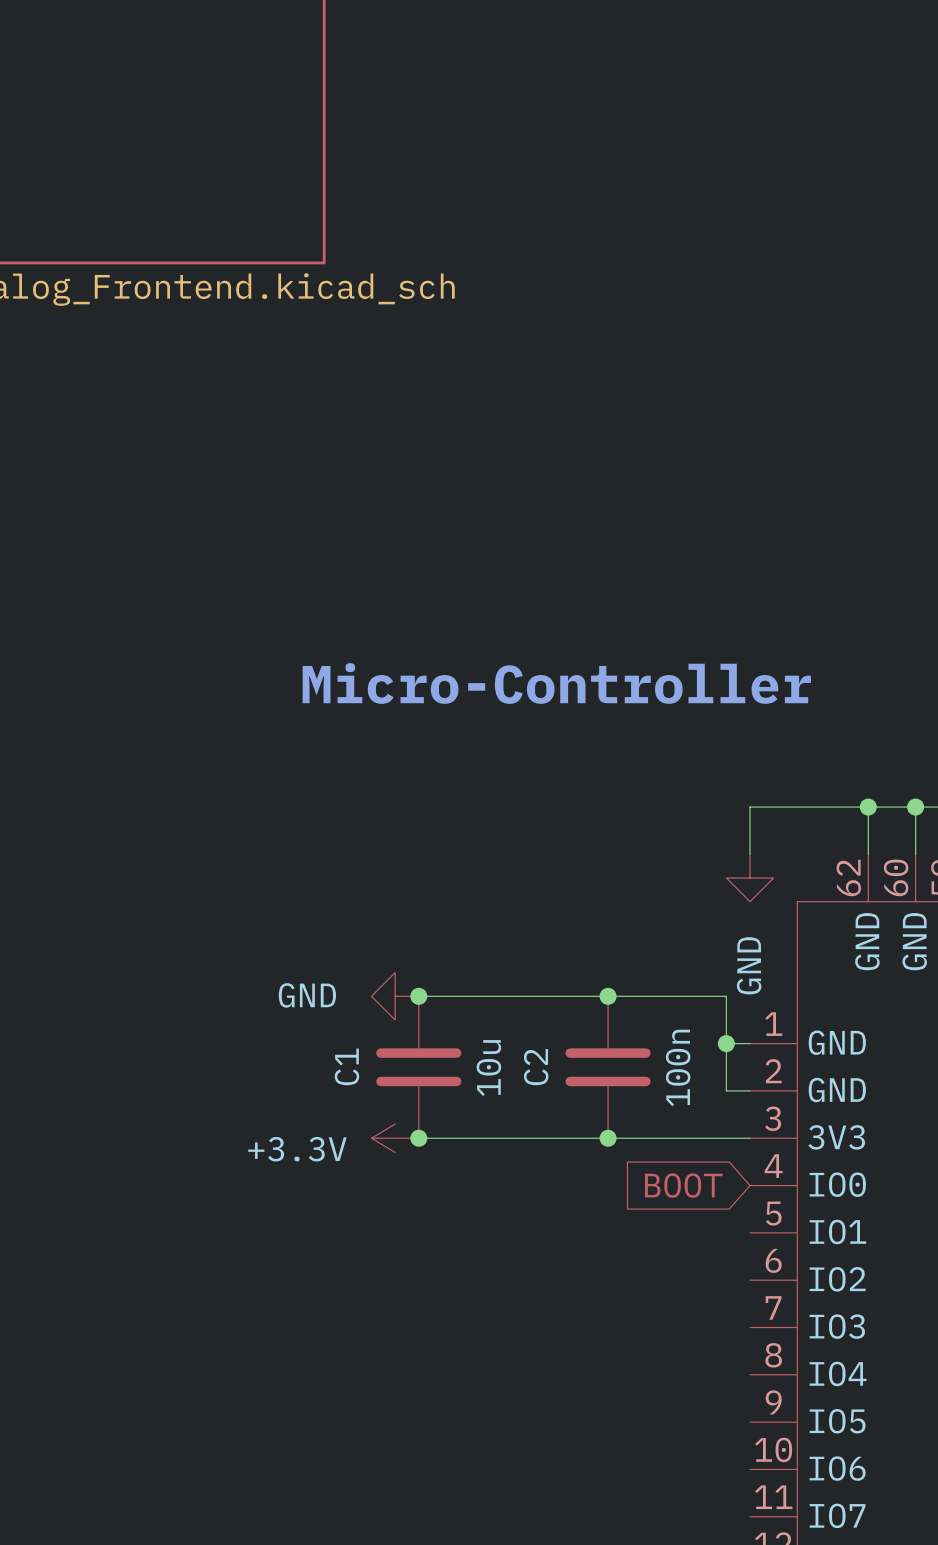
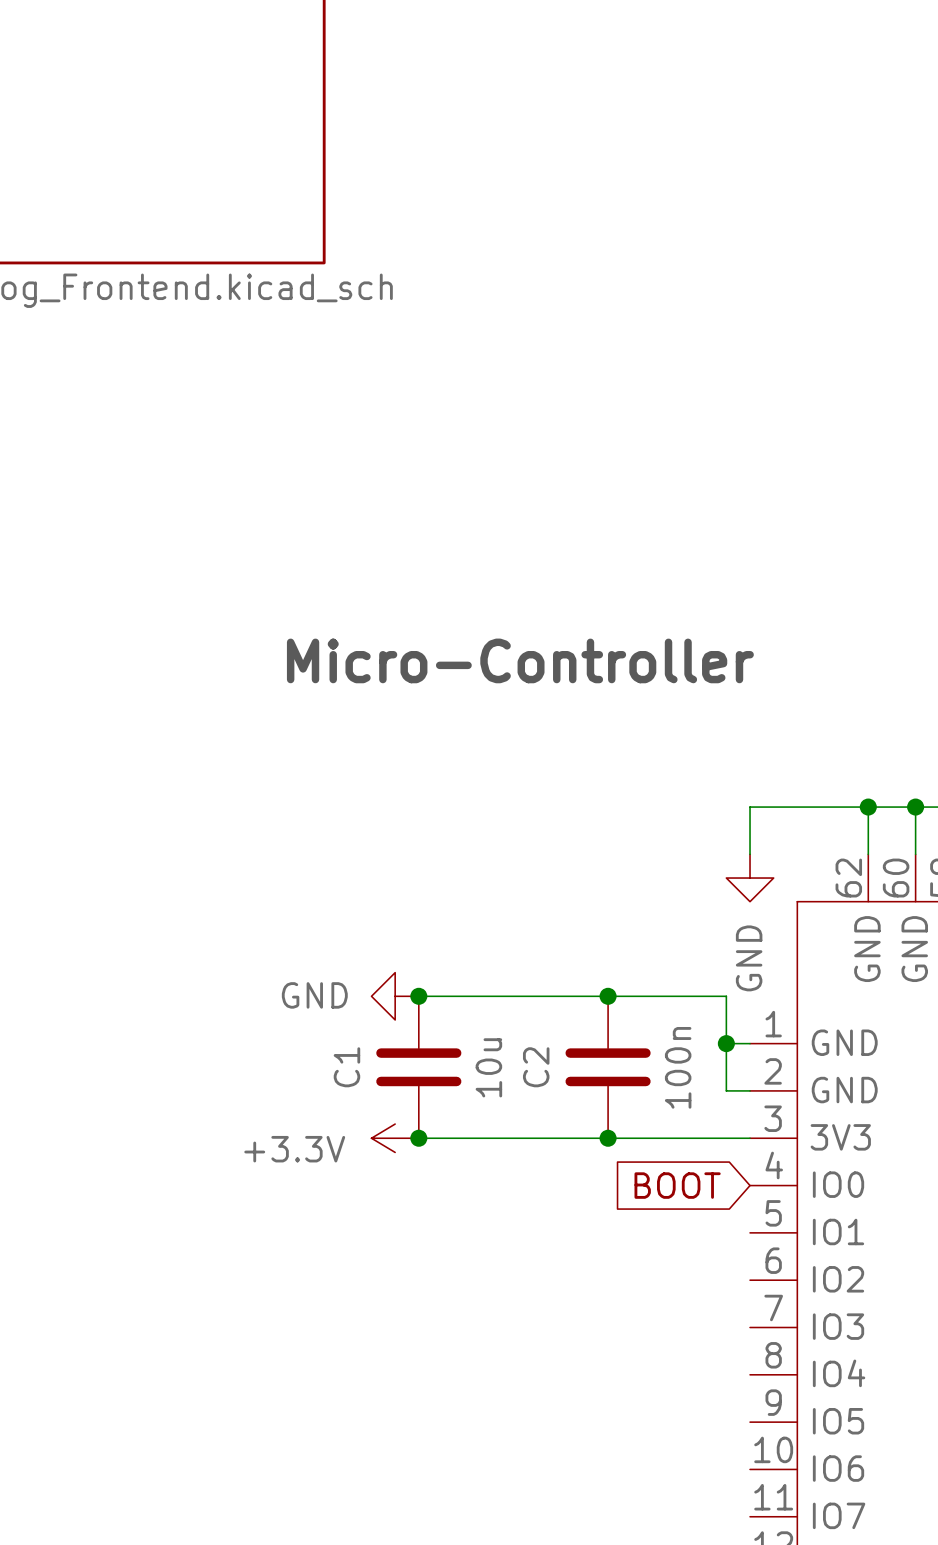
text position: Micro-Controller (556, 683) -> Micro-Controller (520, 660)

